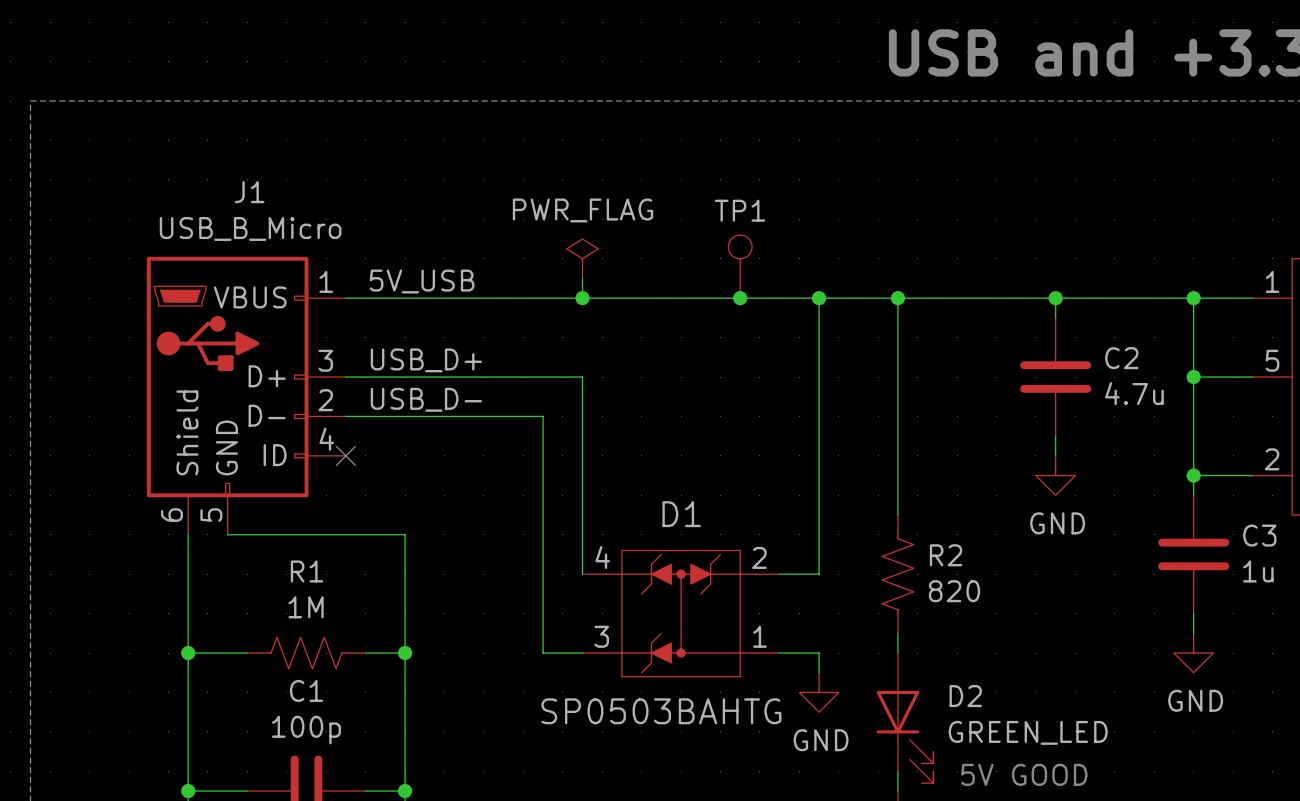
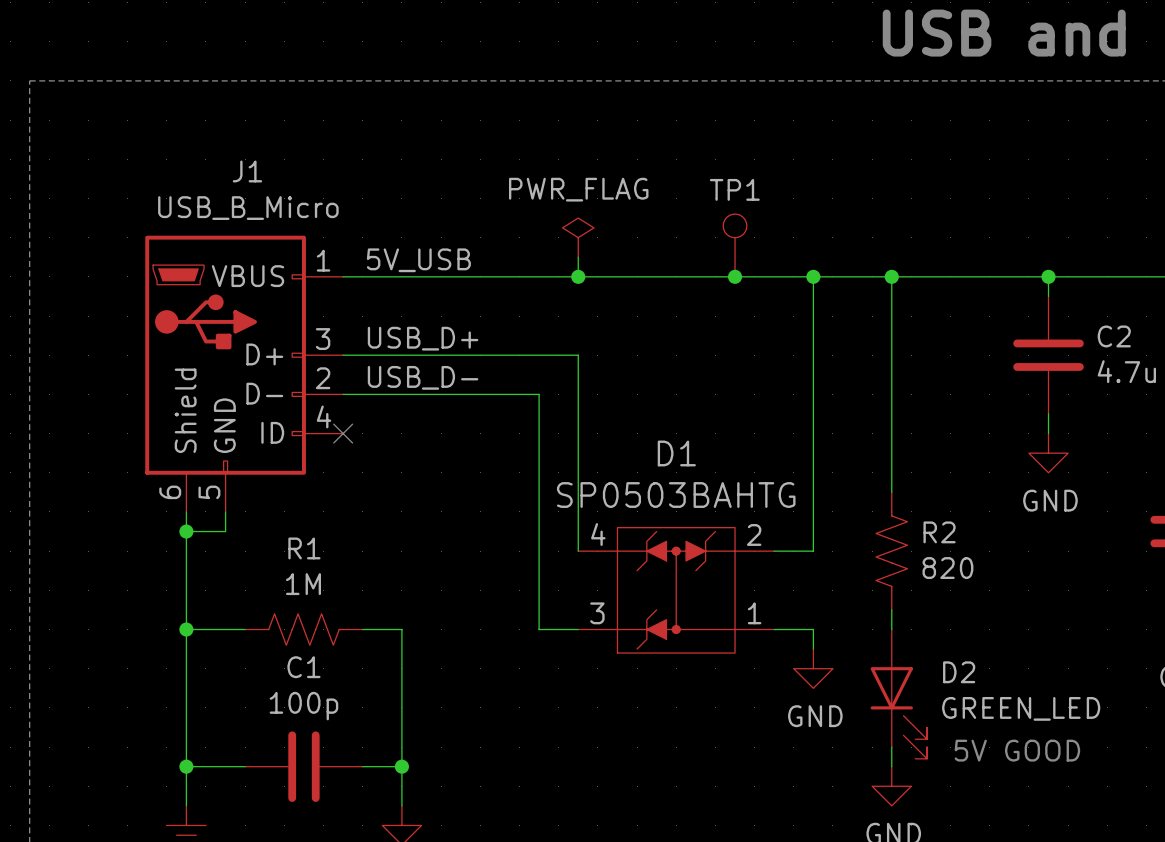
D1 name position: D1 (681, 514) -> D1 (676, 453)
wire: (227, 534) (405, 534) (405, 653) -> (225, 511) (225, 531) (186, 531)
junction: none -> (186, 531)
junction: (405, 653) -> none
D1 value position: SP0503BAHTG (661, 711) -> SP0503BAHTG (676, 495)

